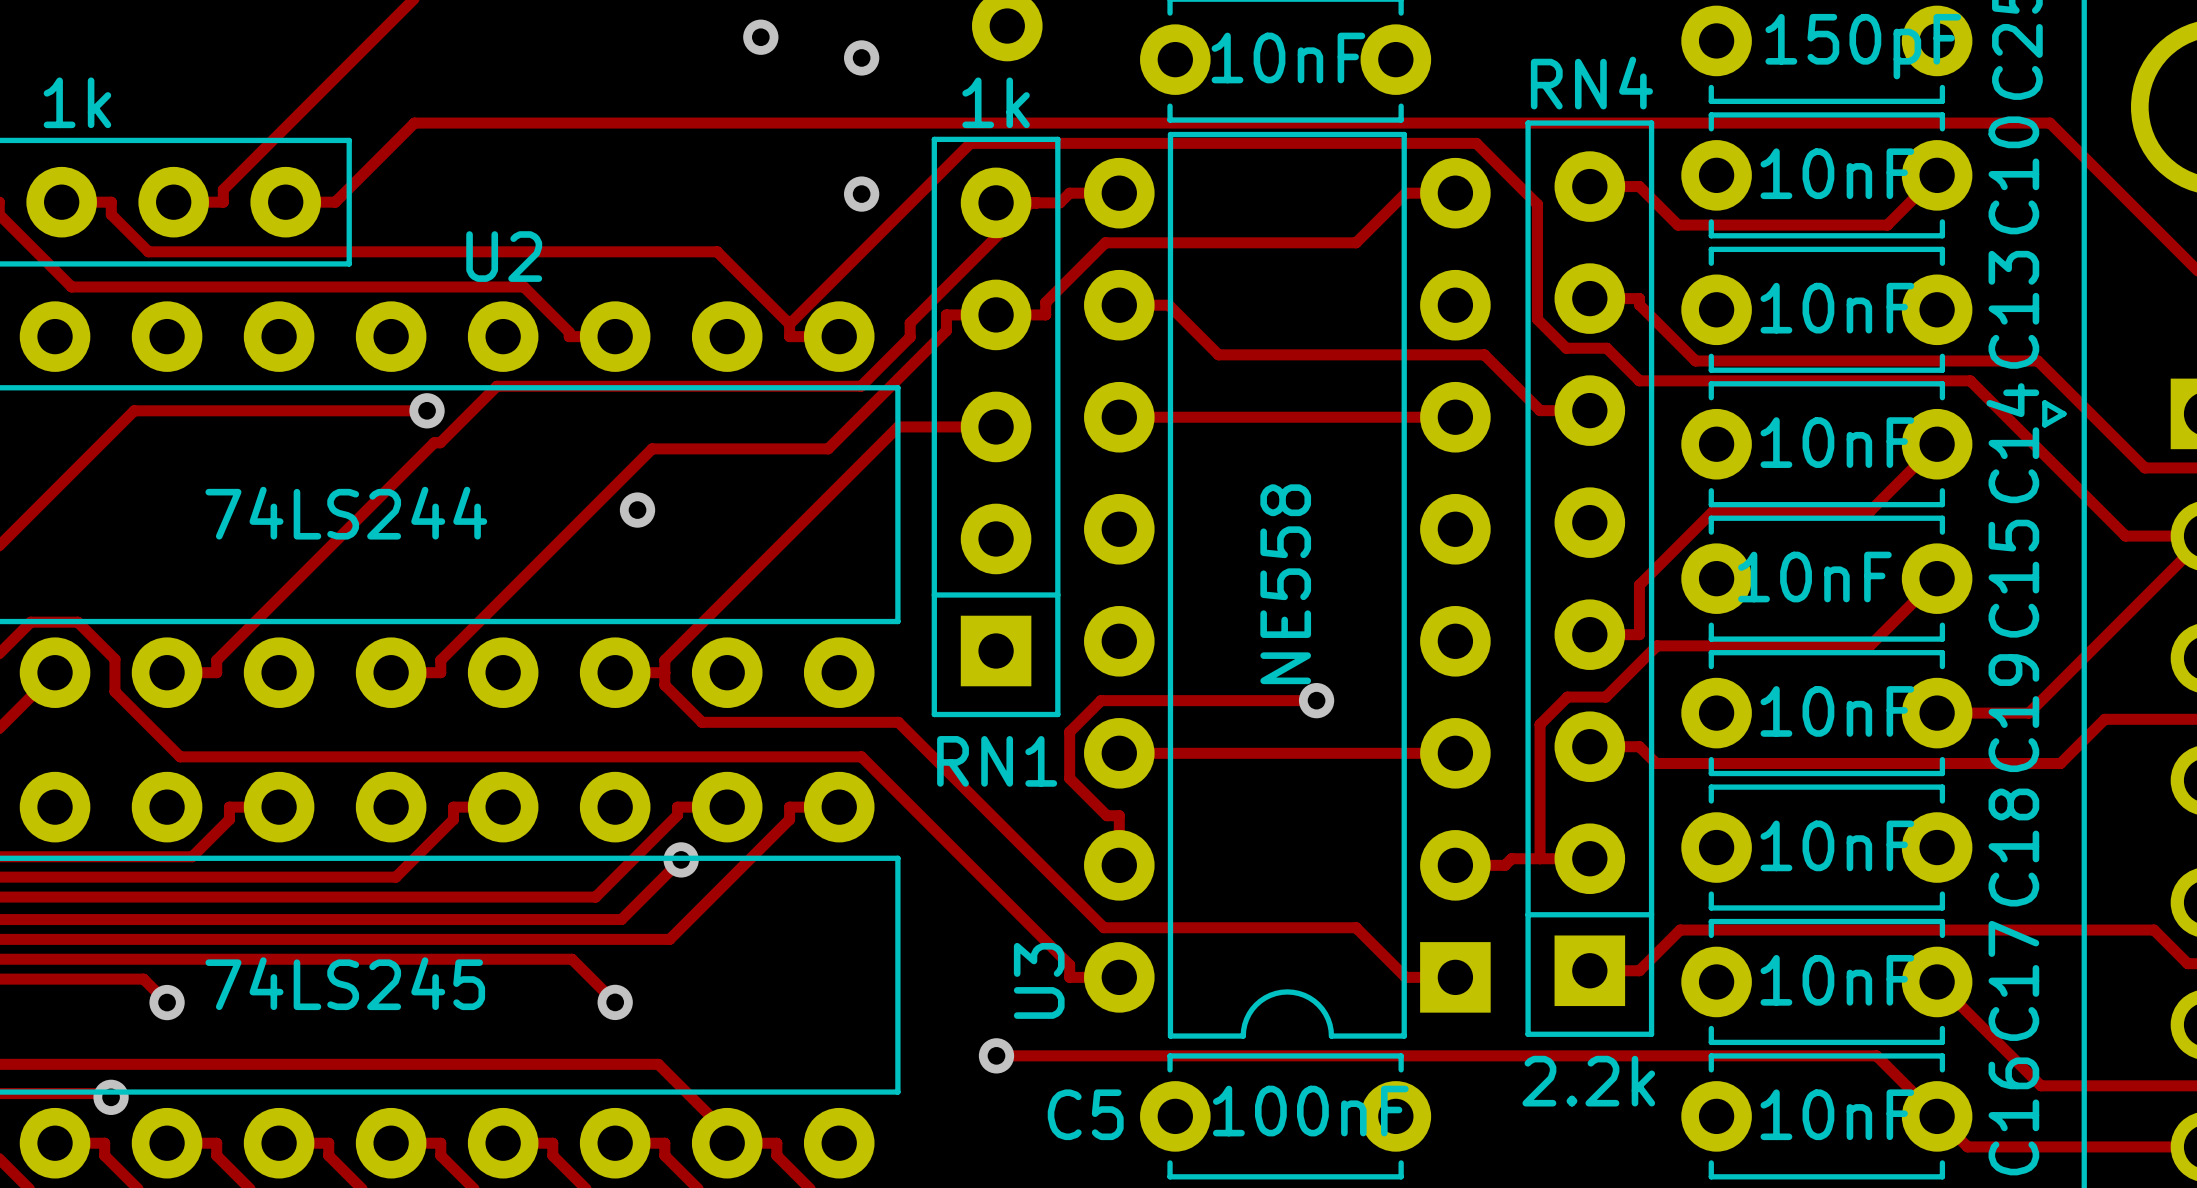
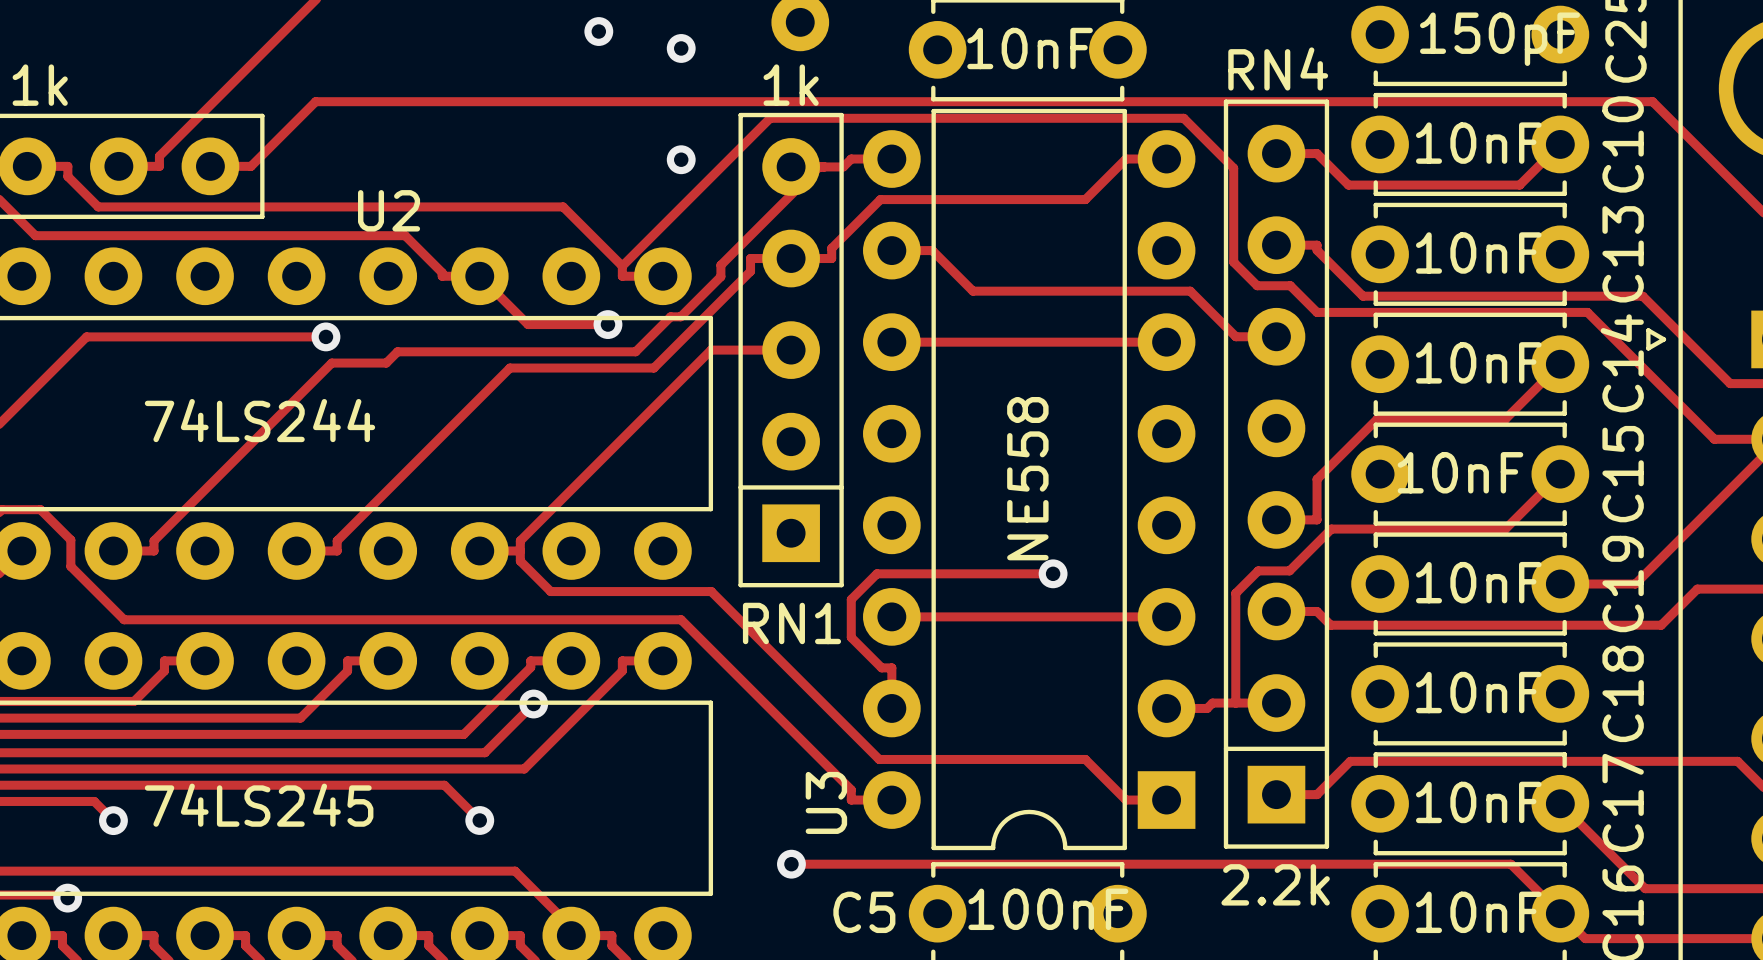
track: none -> (479, 276) (528, 324) (607, 324)
track: (848, 386) (496, 386) (440, 442) -> (670, 316) (635, 351) (397, 351) (386, 363) (336, 363)
via position: (637, 510) -> (607, 324)

